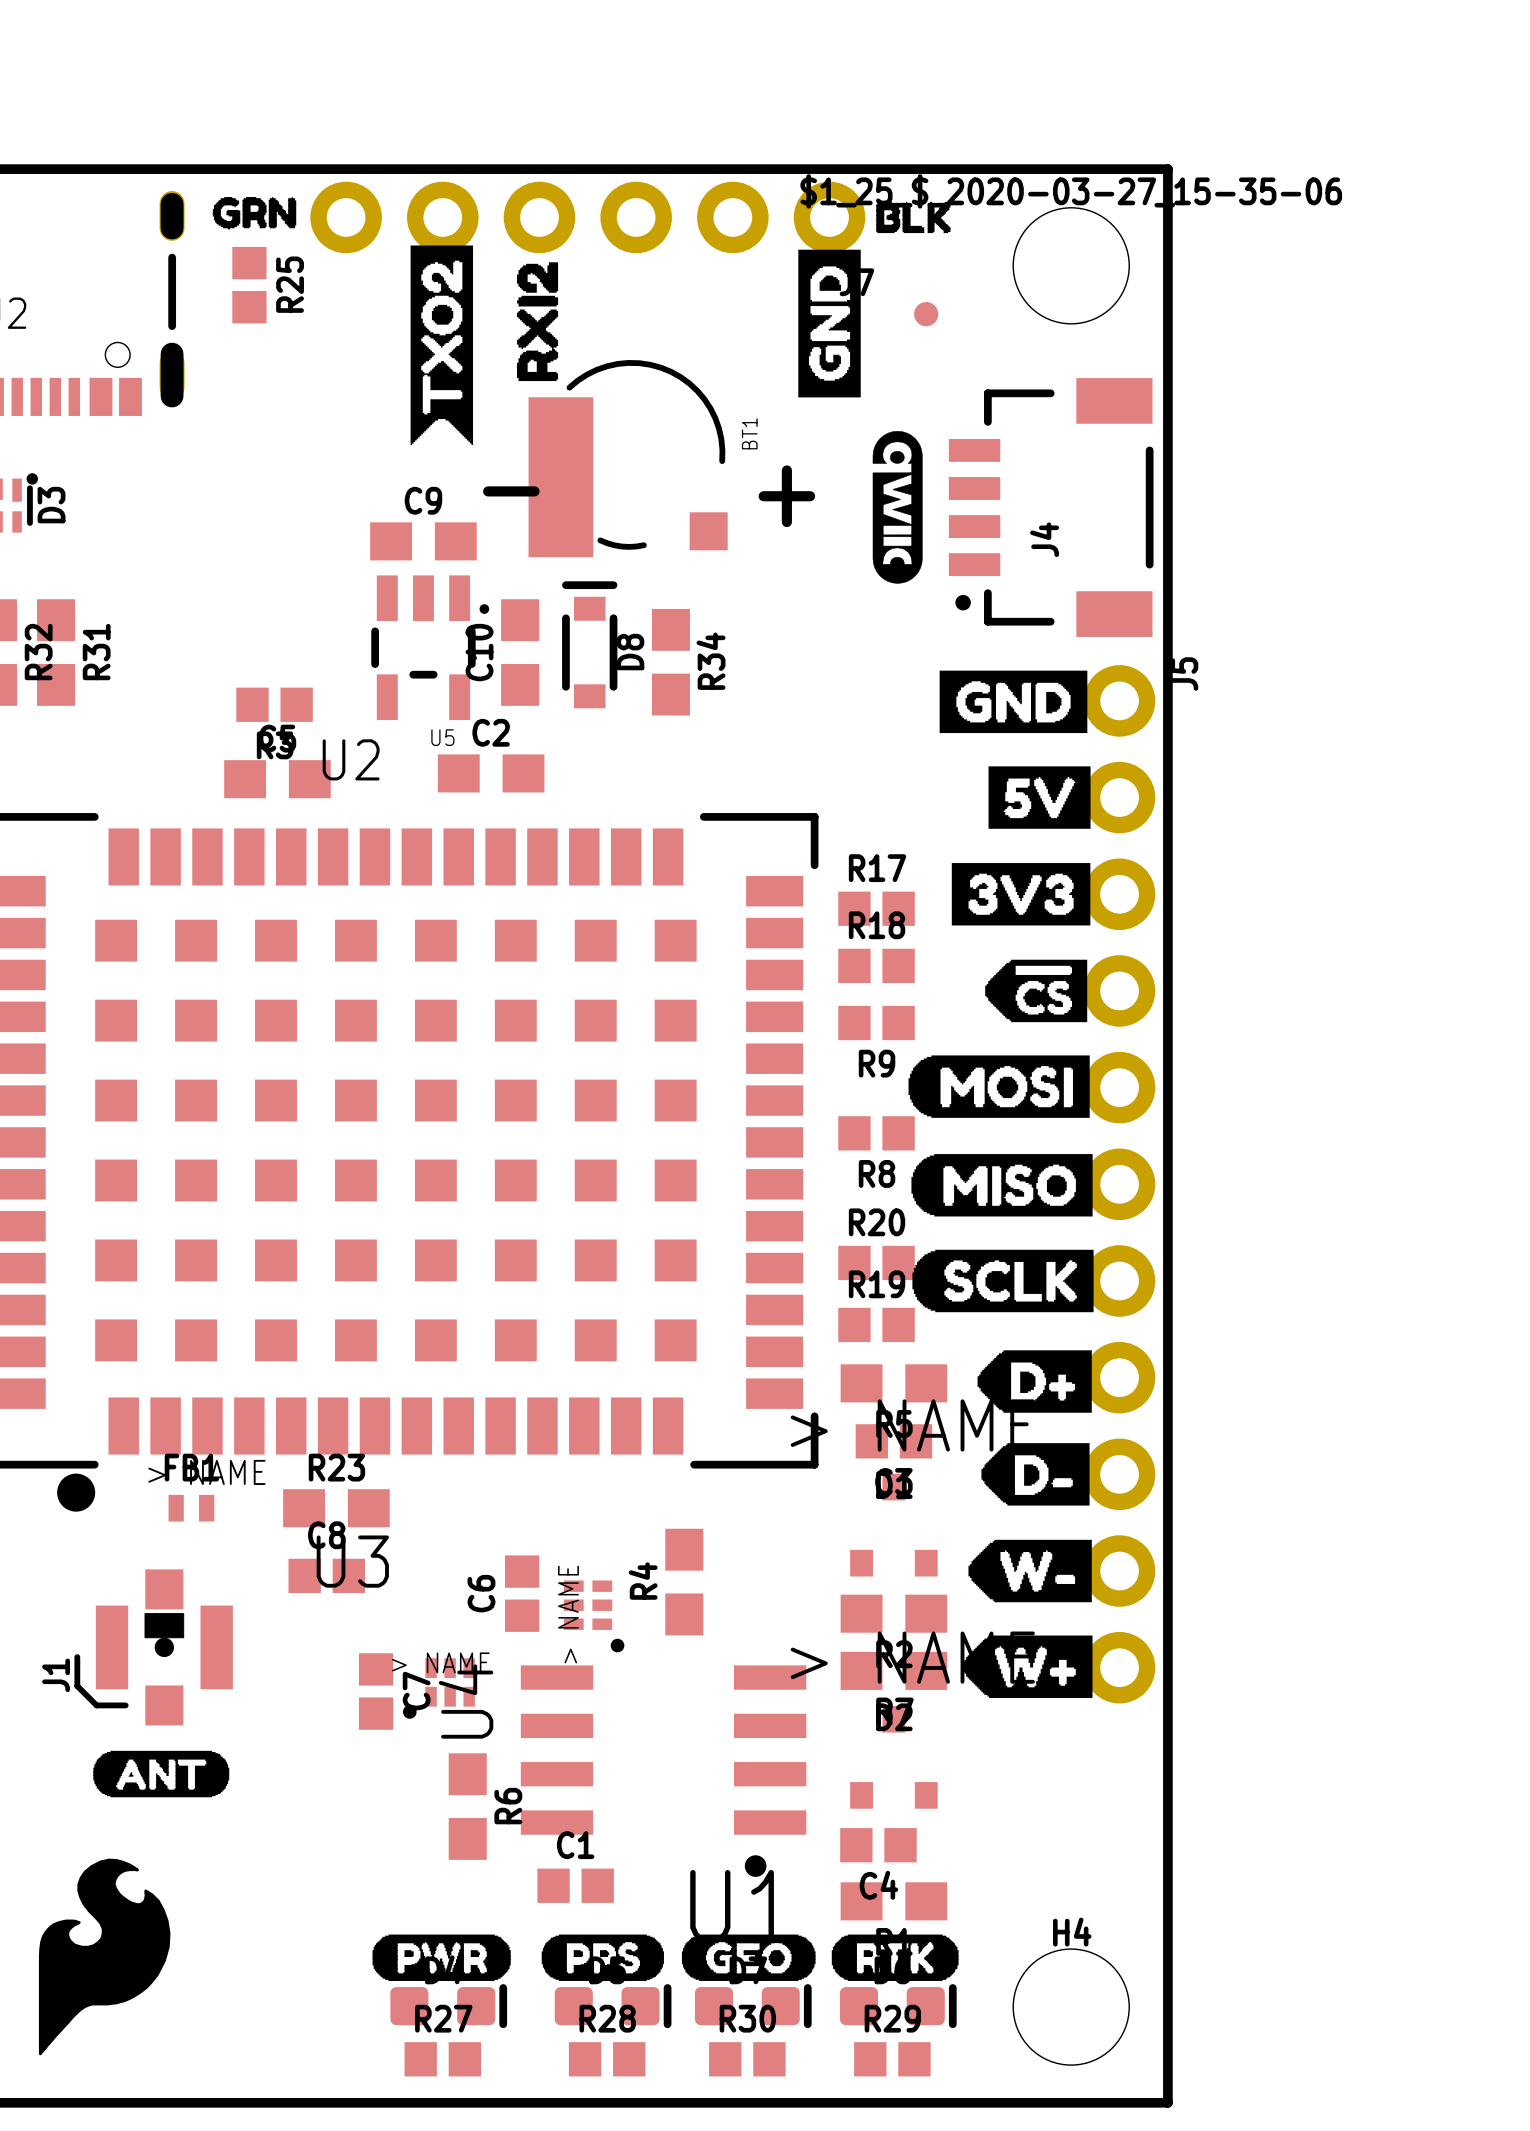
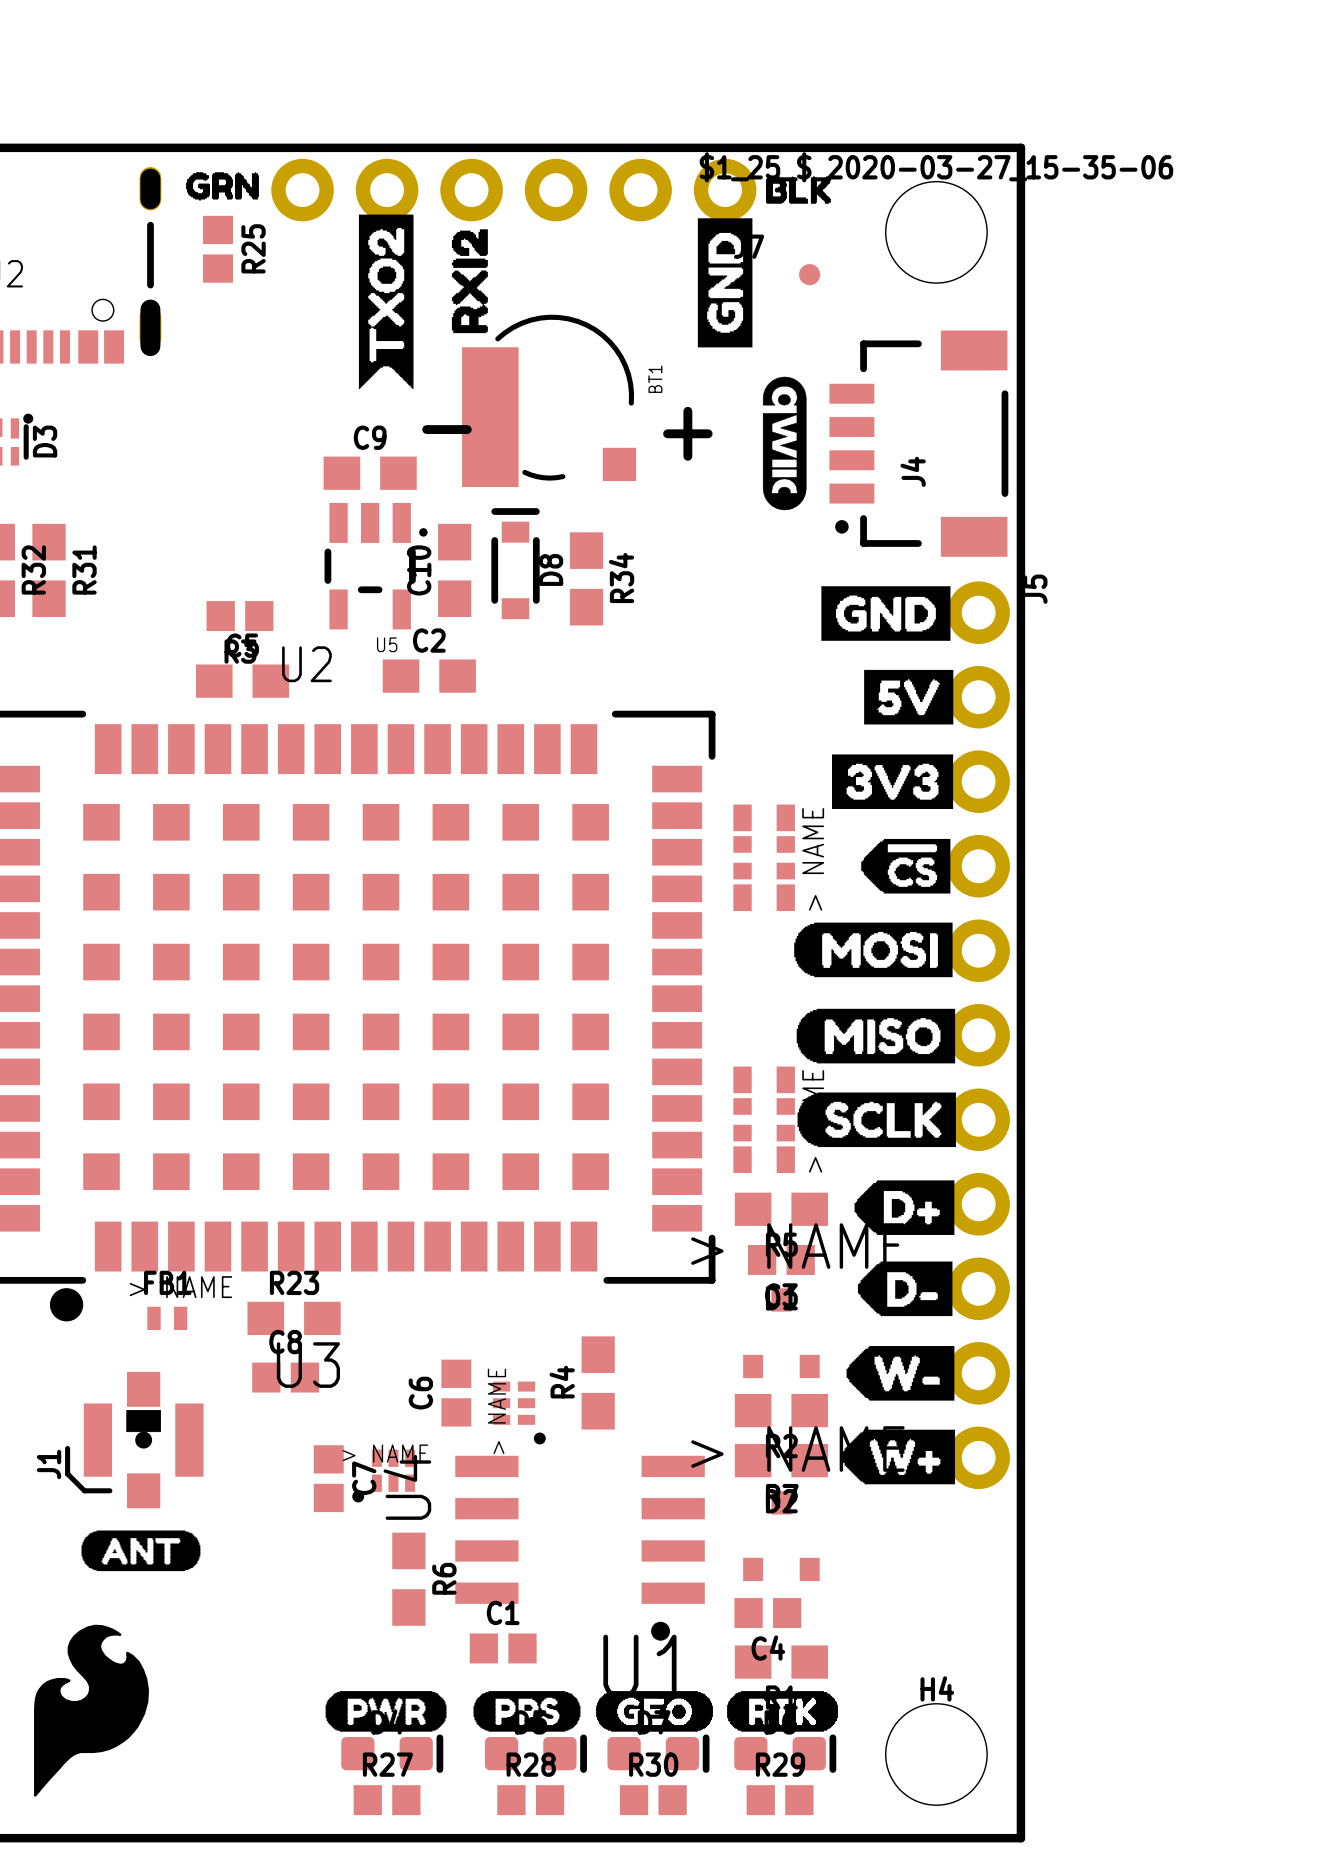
R17: (876, 908) -> none
R18: (876, 965) -> none
part: none -> (764, 857)
R9: (876, 1023) -> none
R8: (876, 1133) -> none
R20: (876, 1262) -> none
part: none -> (764, 1119)
R19: (876, 1324) -> none

